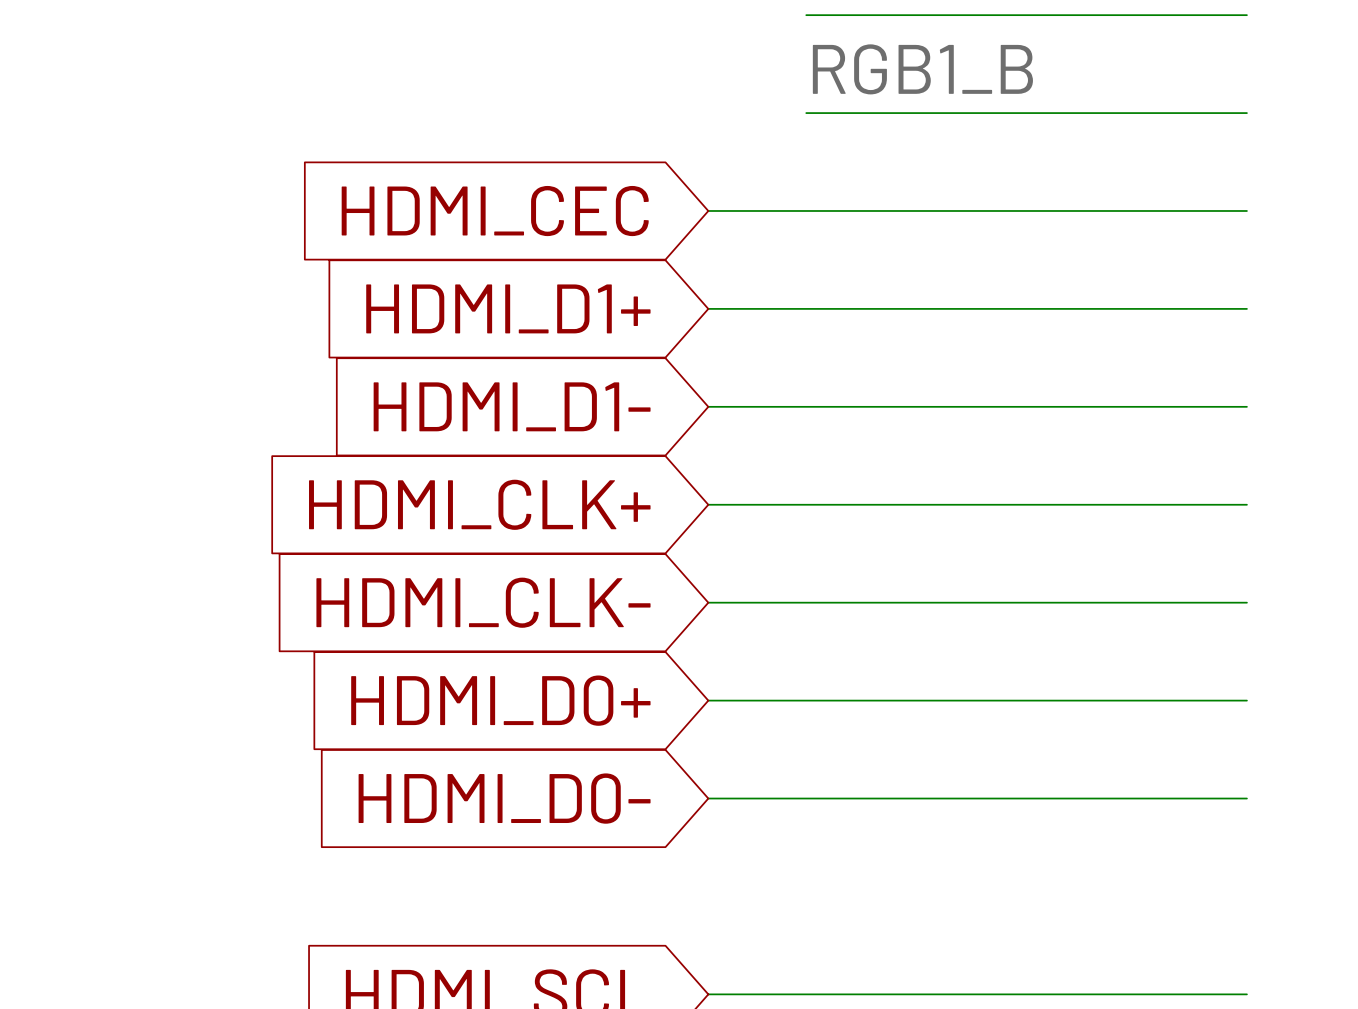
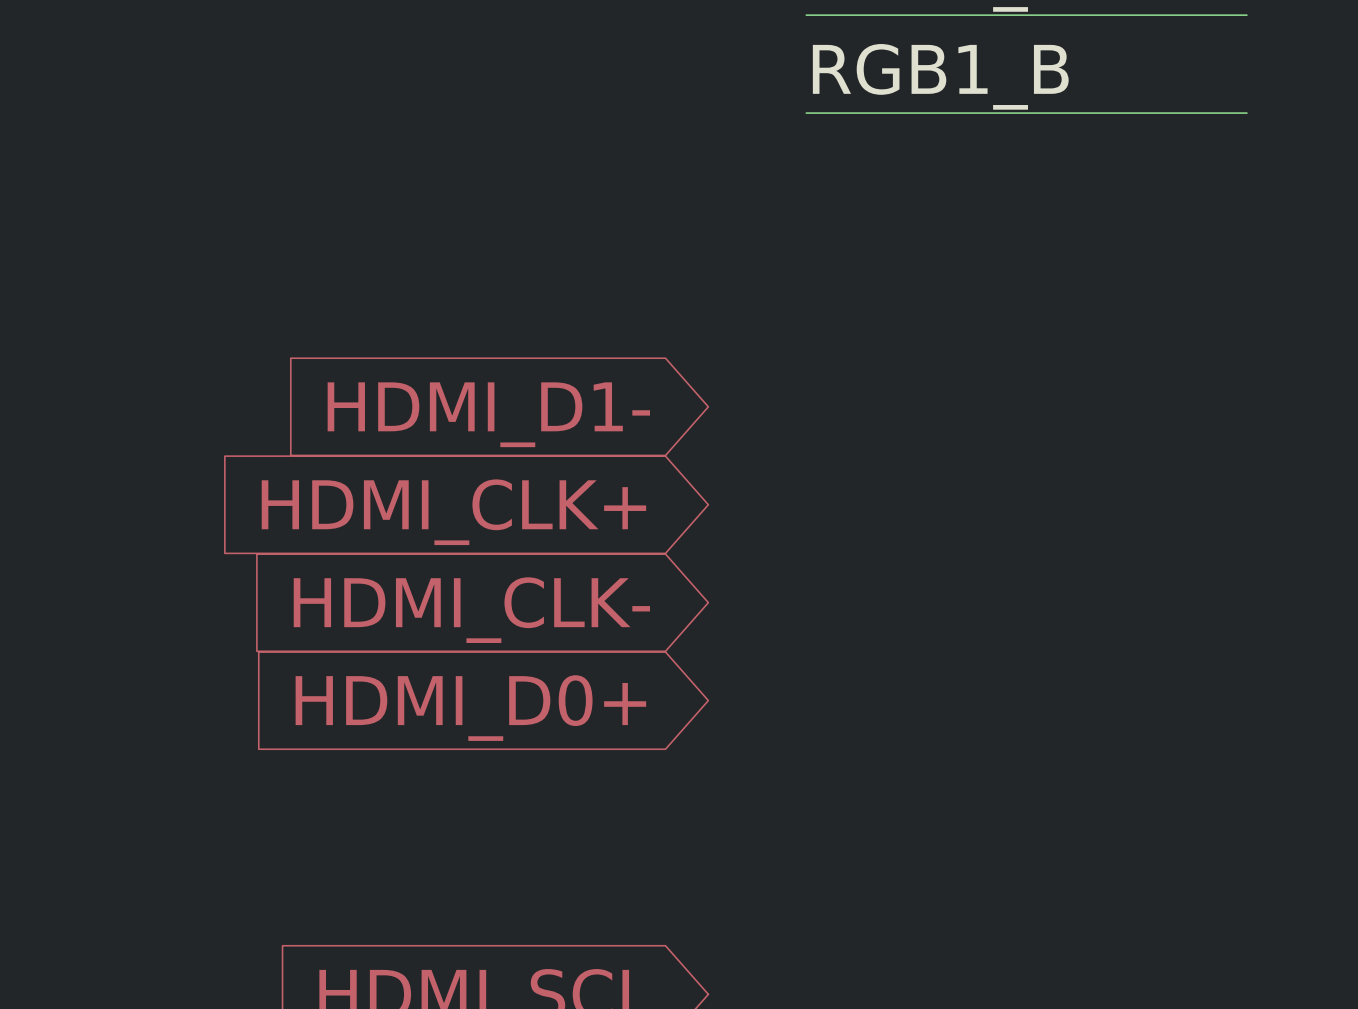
wire: (708, 210) (1246, 210) -> none
global label: HDMI_CEC (495, 211) -> none
global label: HDMI_D1+ (508, 308) -> none
wire: (708, 308) (1246, 308) -> none
wire: (708, 406) (1246, 406) -> none
wire: (708, 504) (1246, 504) -> none
wire: (708, 602) (1246, 602) -> none
wire: (708, 700) (1246, 700) -> none
global label: HDMI_D0- (504, 798) -> none
wire: (708, 798) (1246, 798) -> none
wire: (708, 994) (1246, 994) -> none

